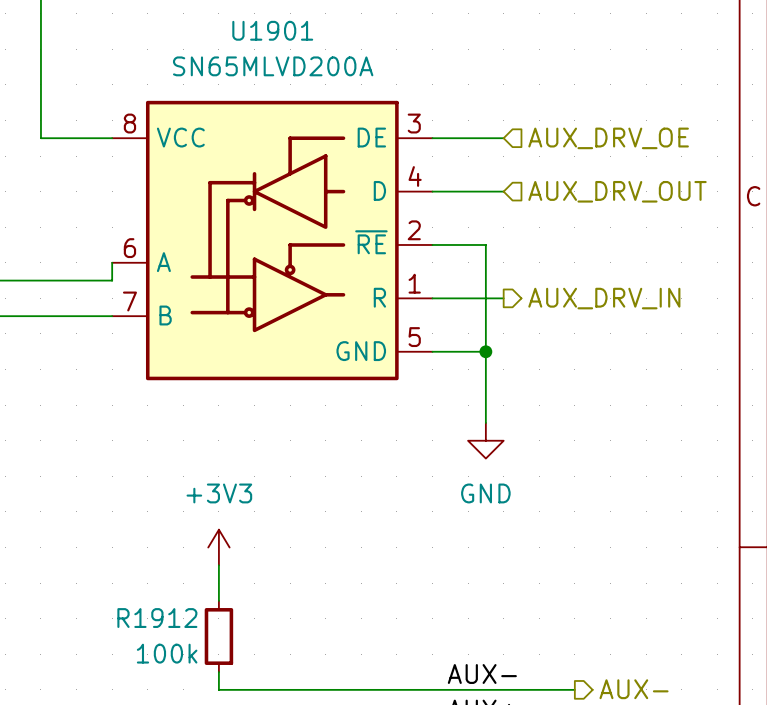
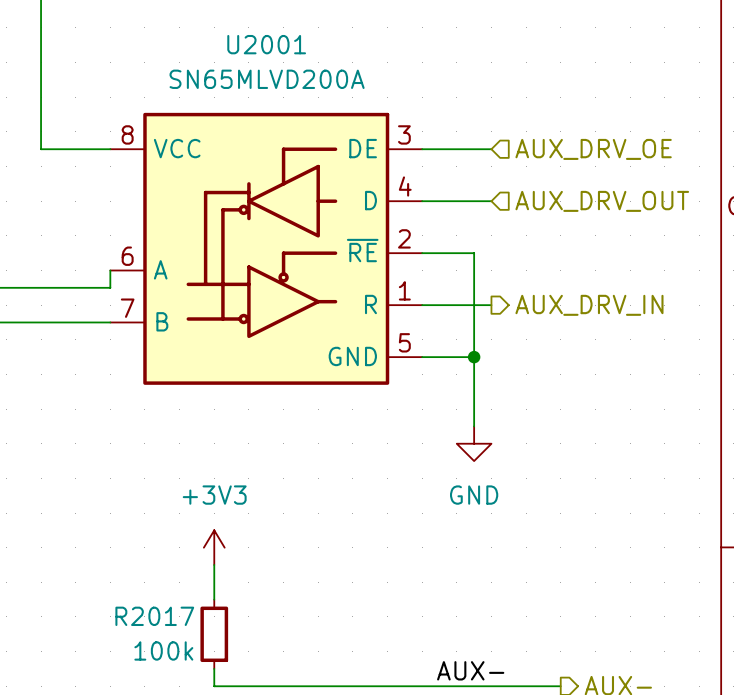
U1901 name: U1901 (272, 30) -> U2001 (266, 44)
R1912 name: R1912 (157, 618) -> R2017 (154, 616)

